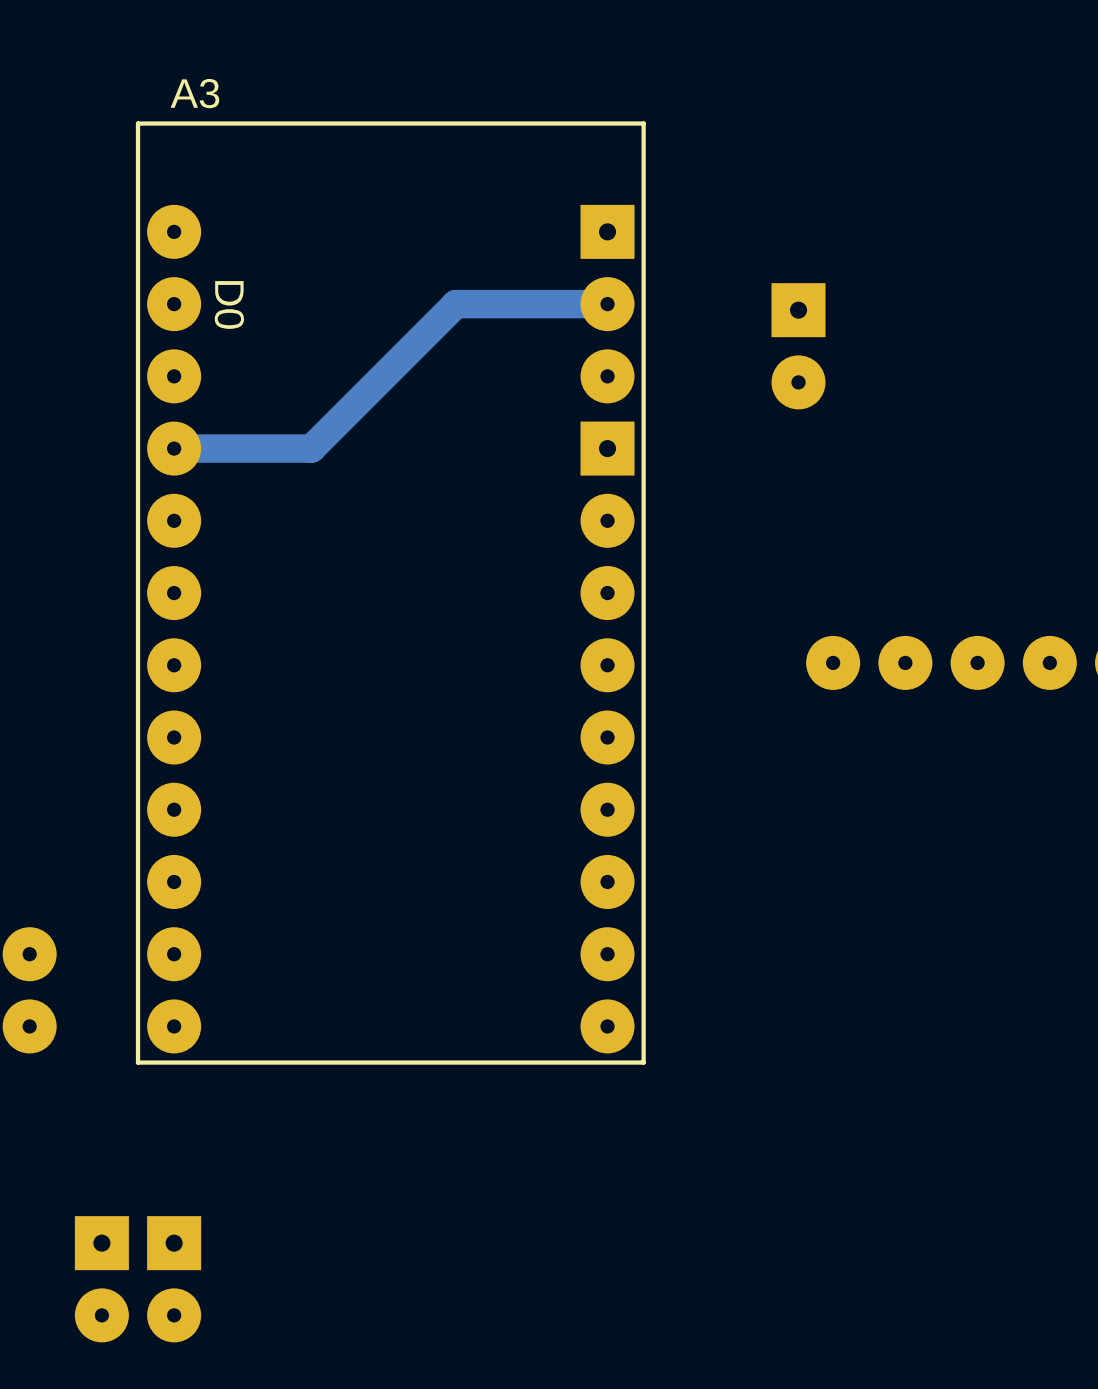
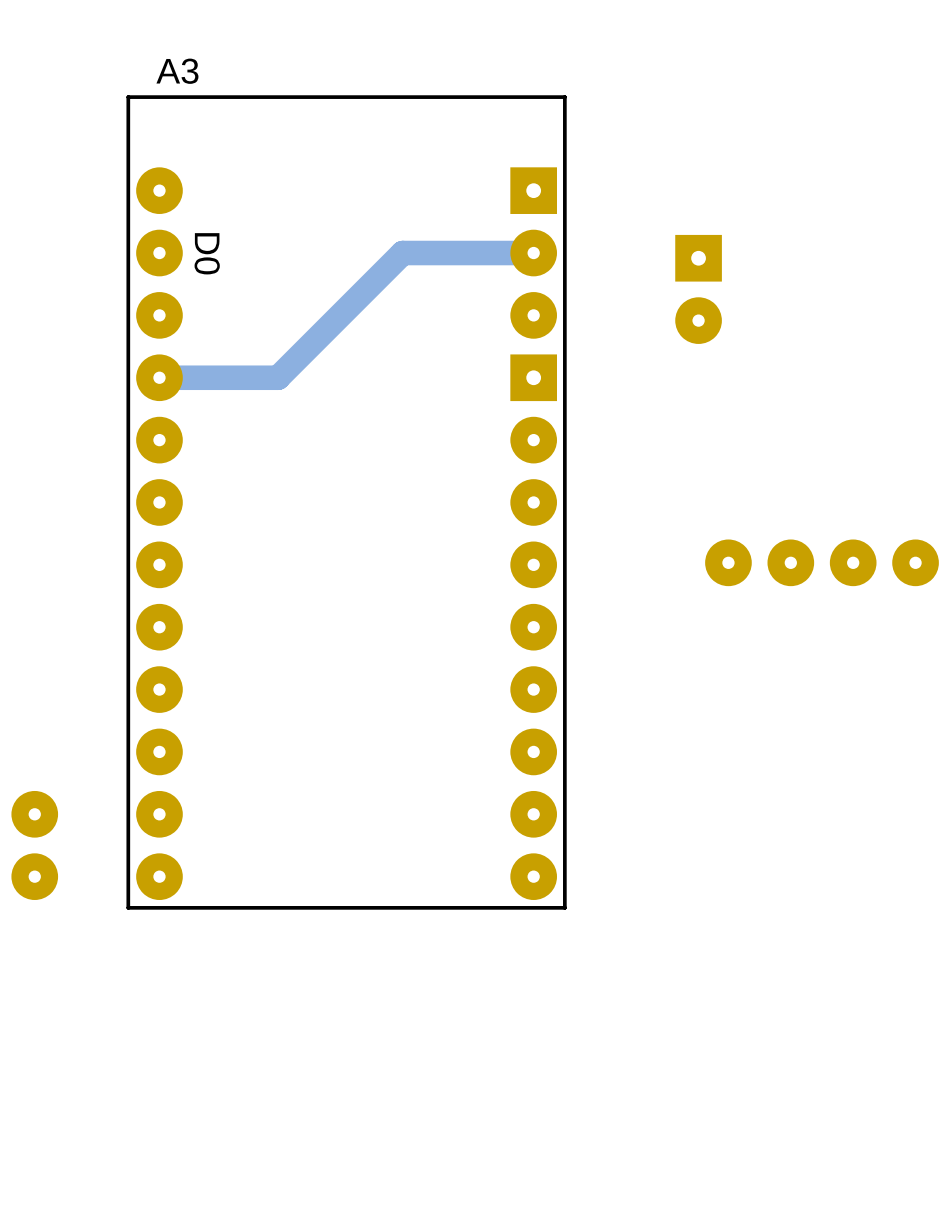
part: (101, 1279) -> none
part: (174, 1279) -> none

